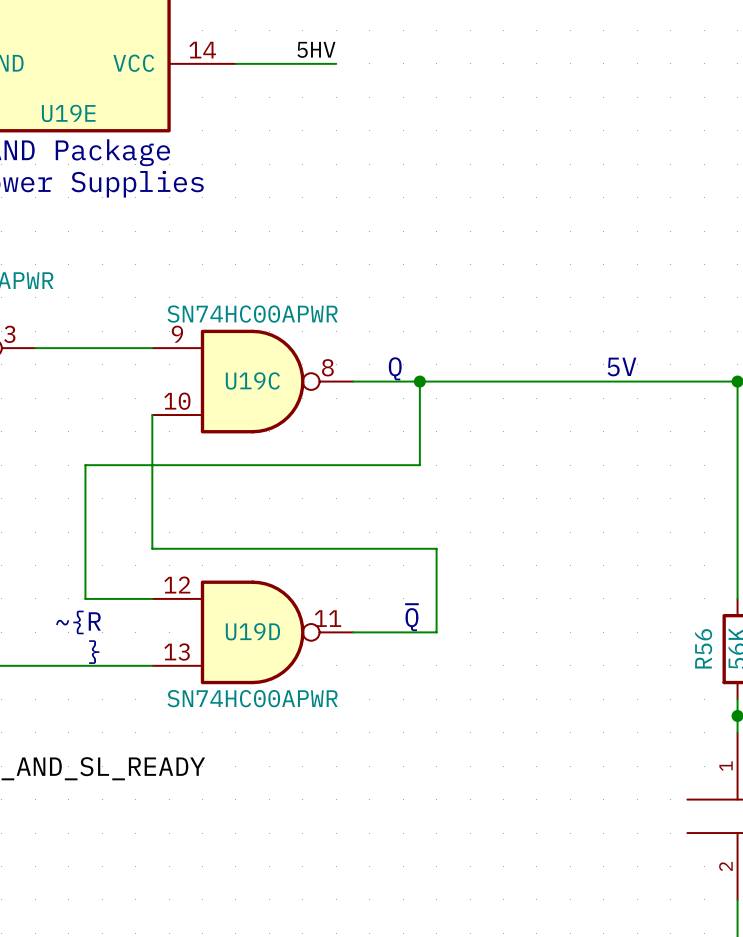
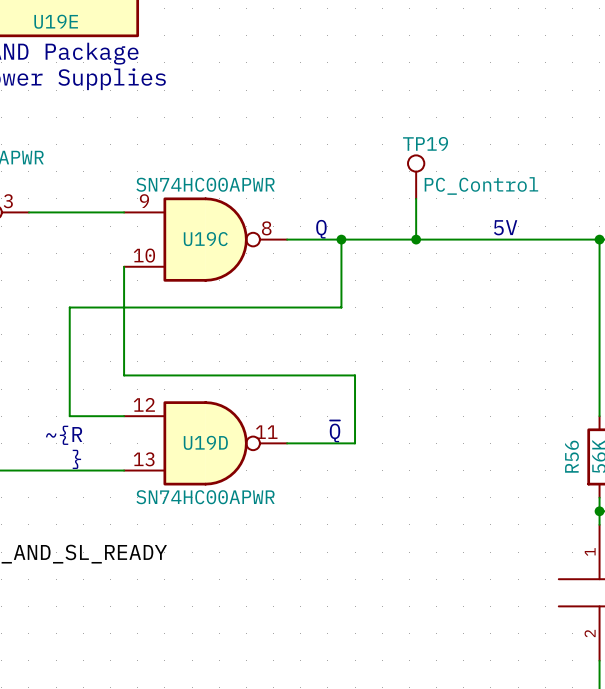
TP19: none -> PC_Control (416, 177)
wire: none -> (416, 198) (416, 239)
junction: none -> (416, 239)

